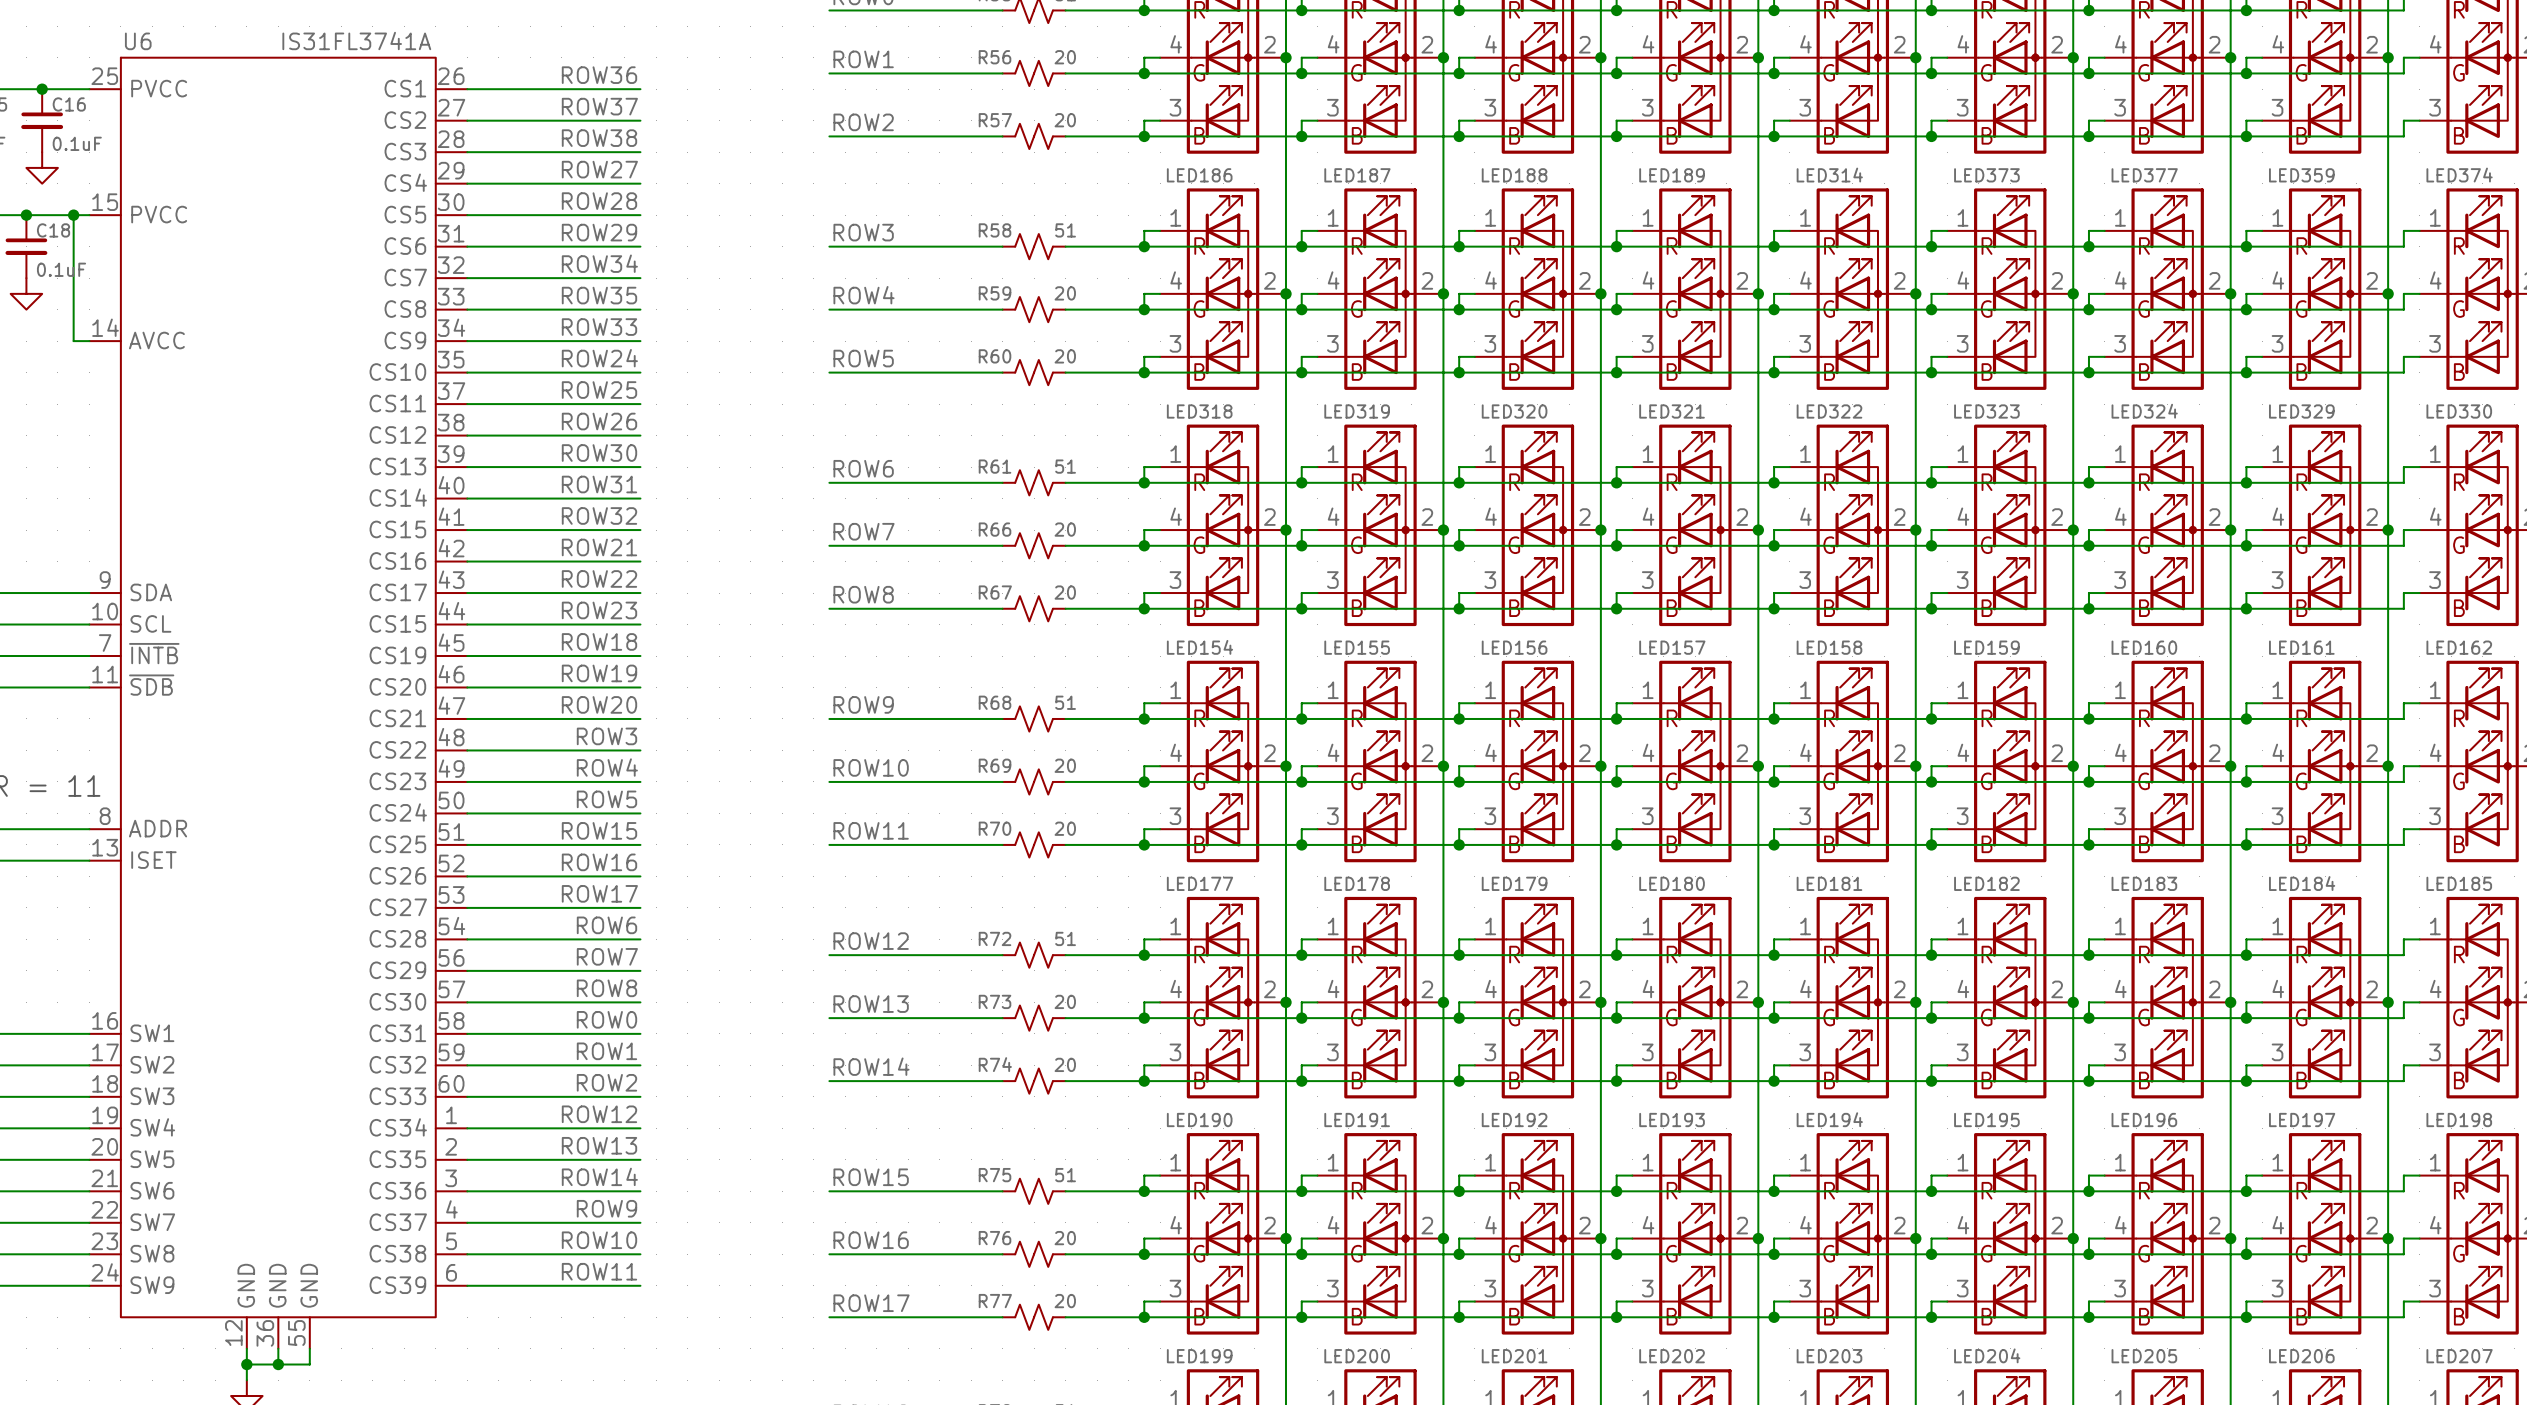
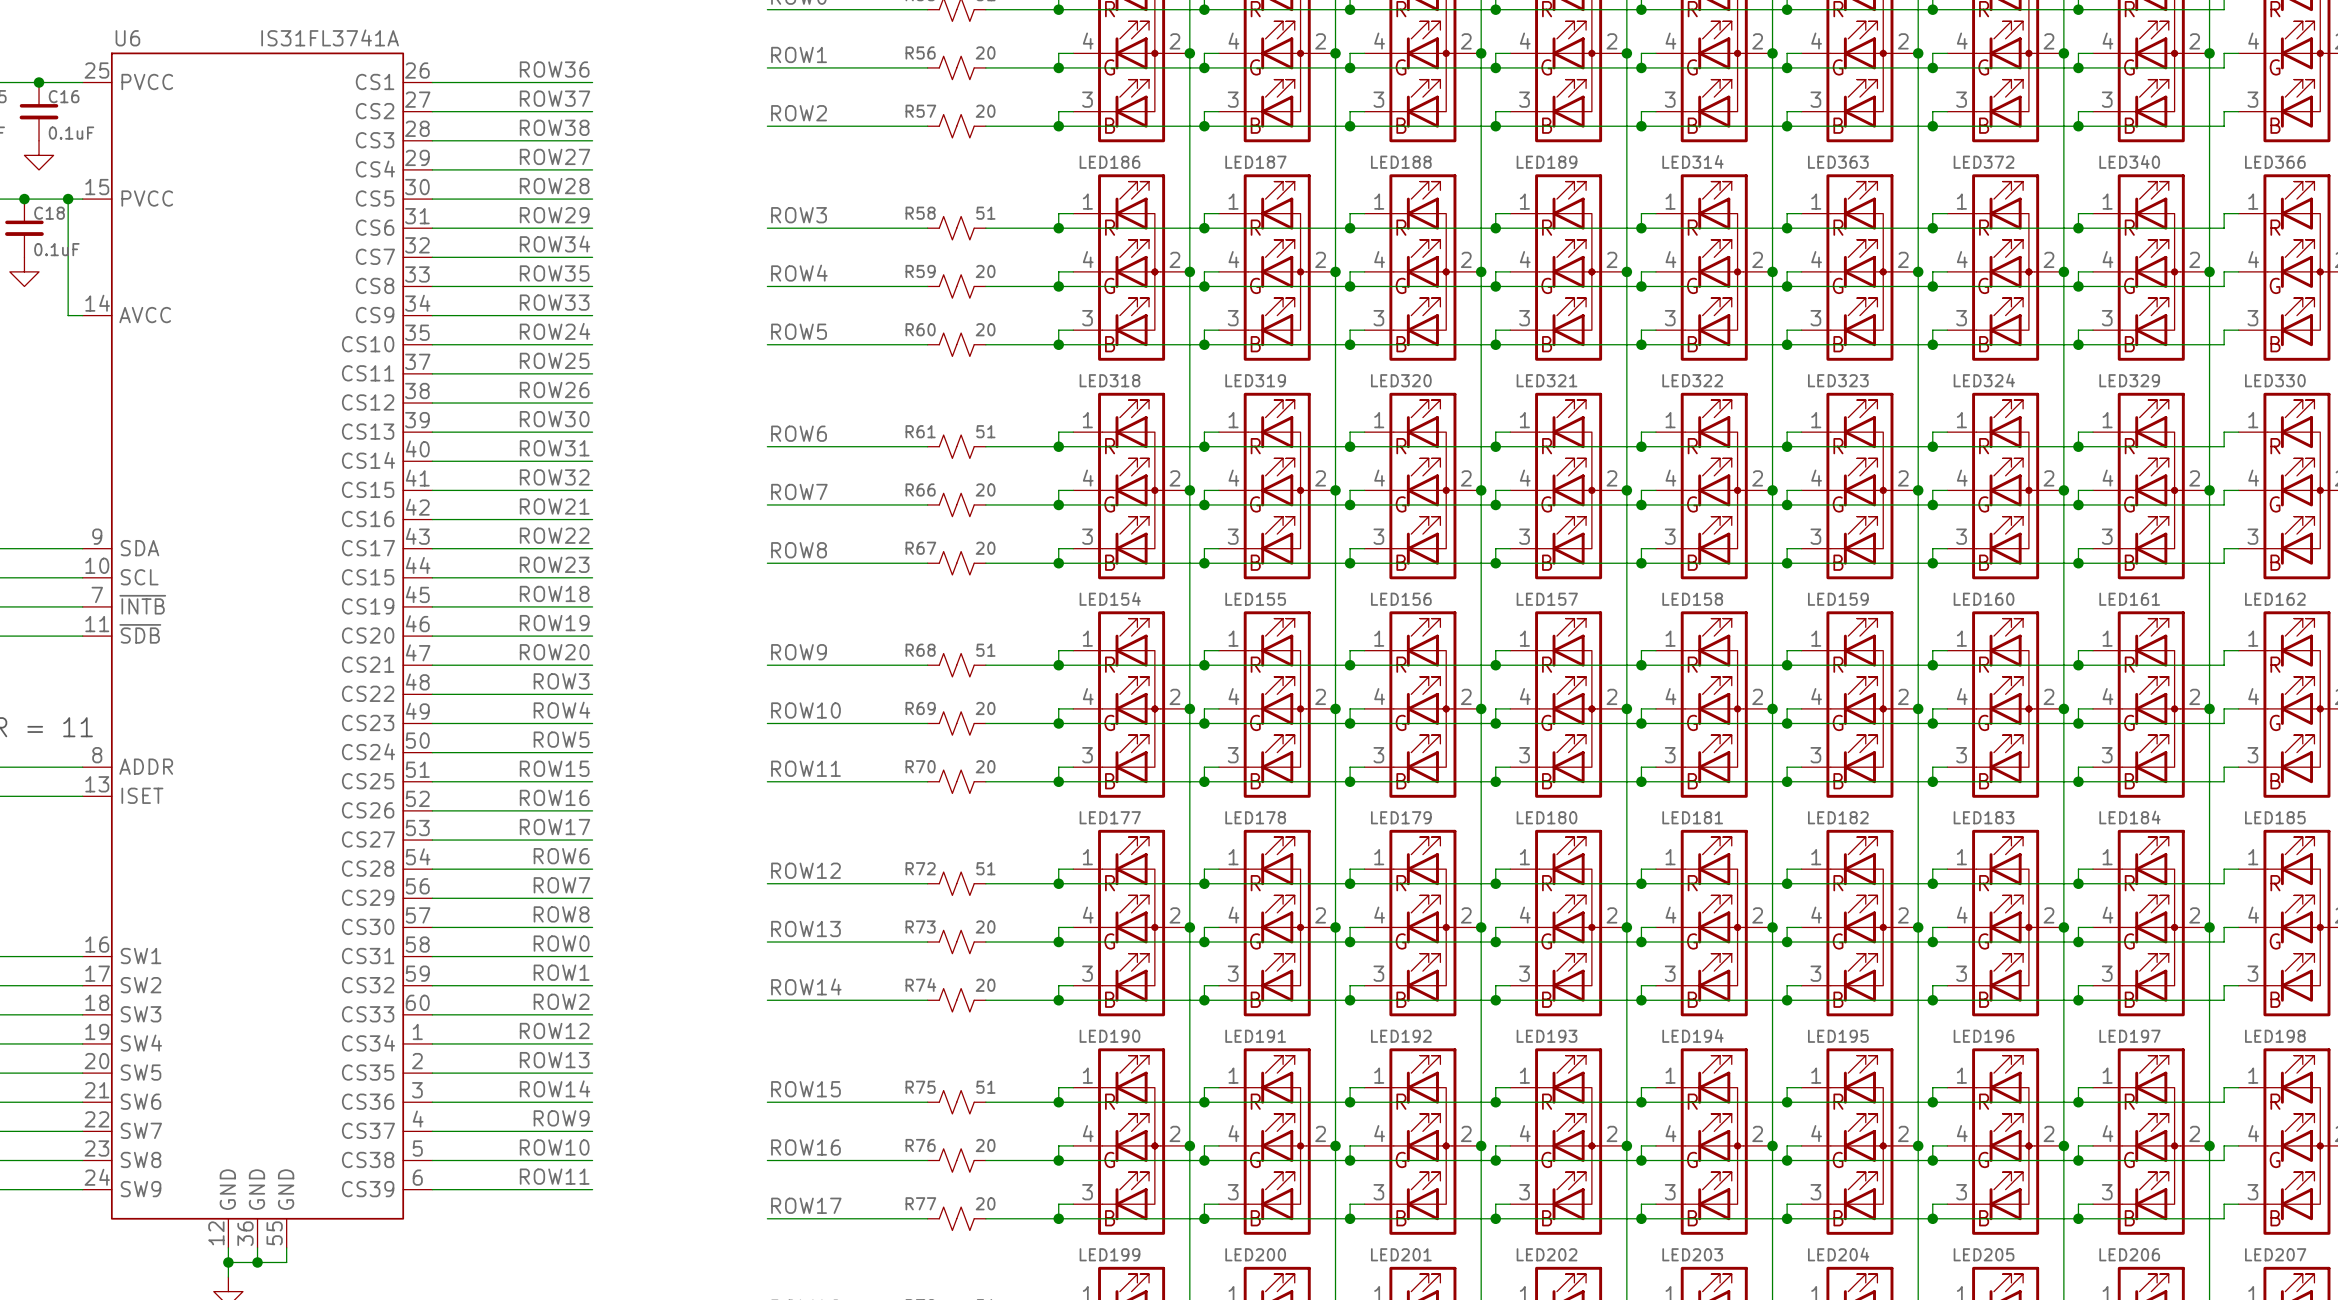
LED373 name: LED373 (1986, 175) -> LED363 (1838, 162)
LED377 name: LED377 (2144, 175) -> LED372 (1984, 162)
LED359 name: LED359 (2301, 175) -> LED340 (2129, 161)
LED374 name: LED374 (2459, 175) -> LED366 (2275, 162)

